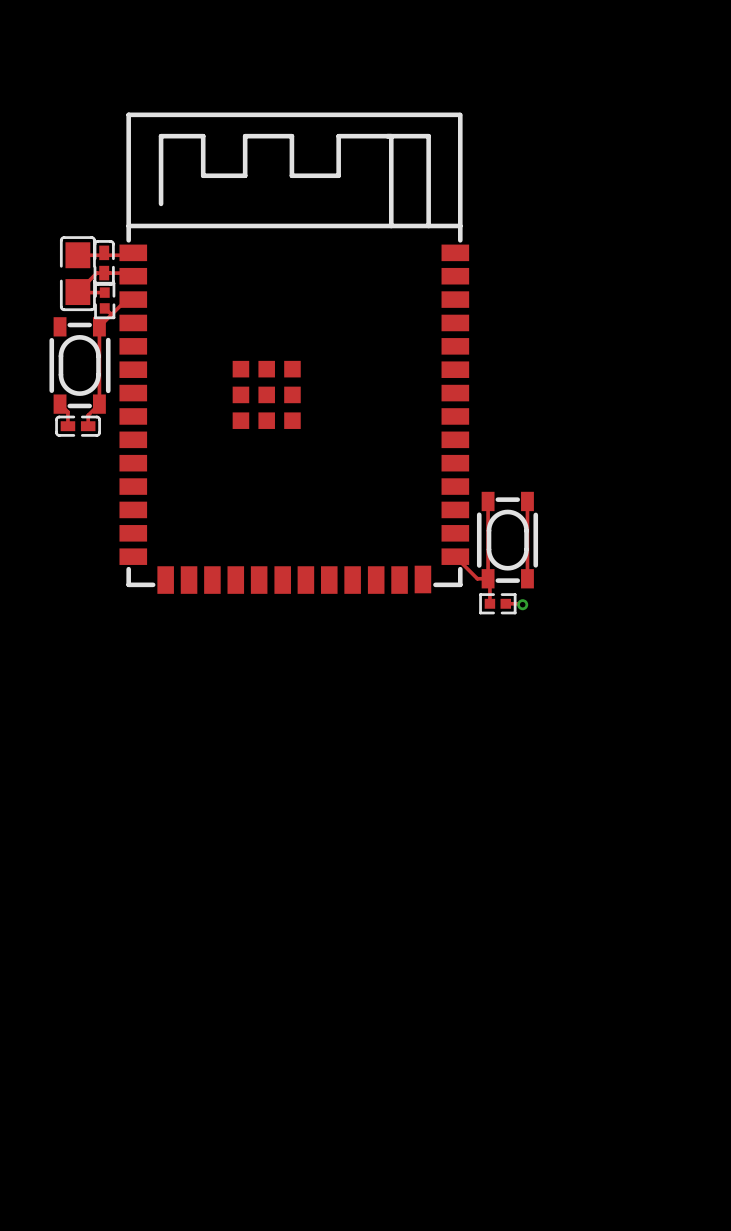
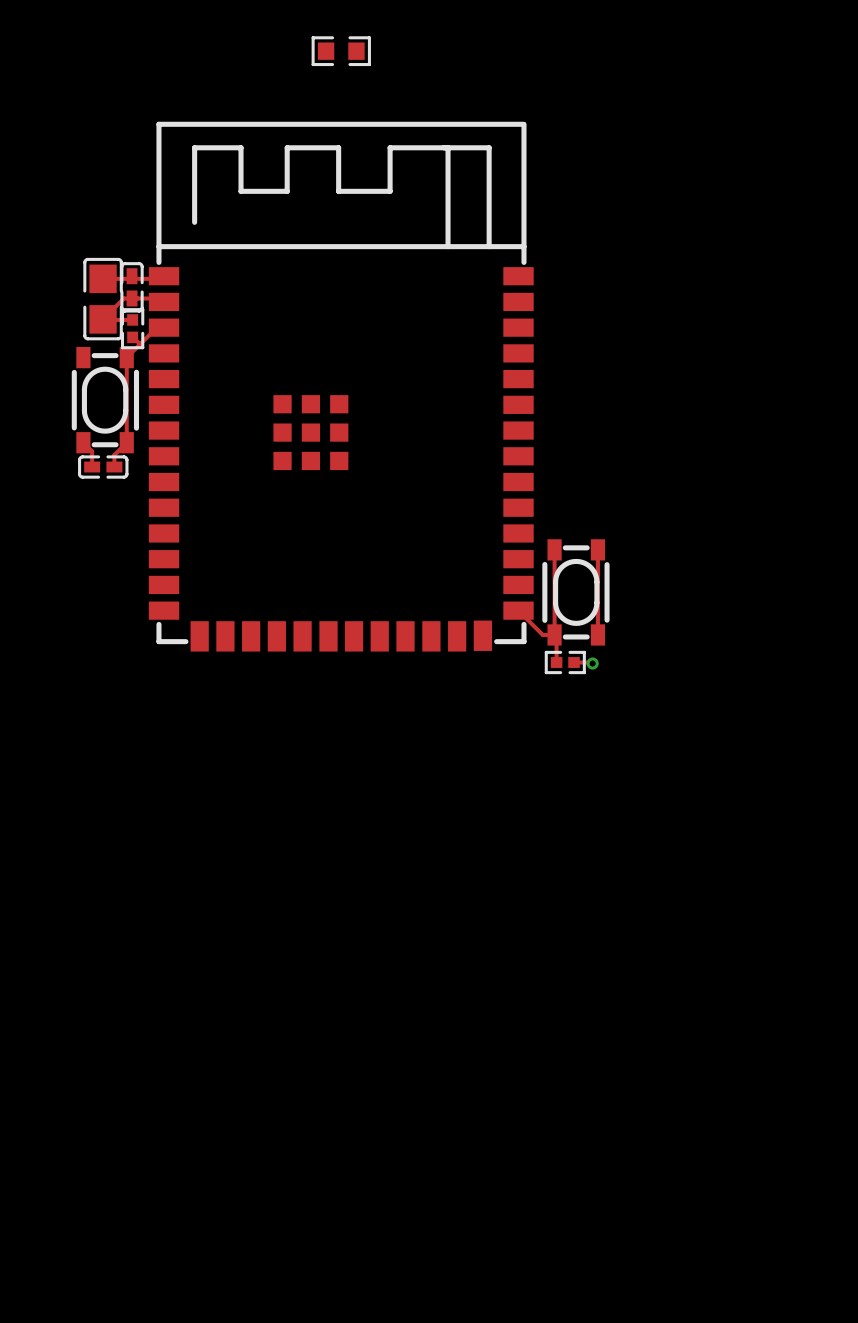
part: none -> (341, 51)

